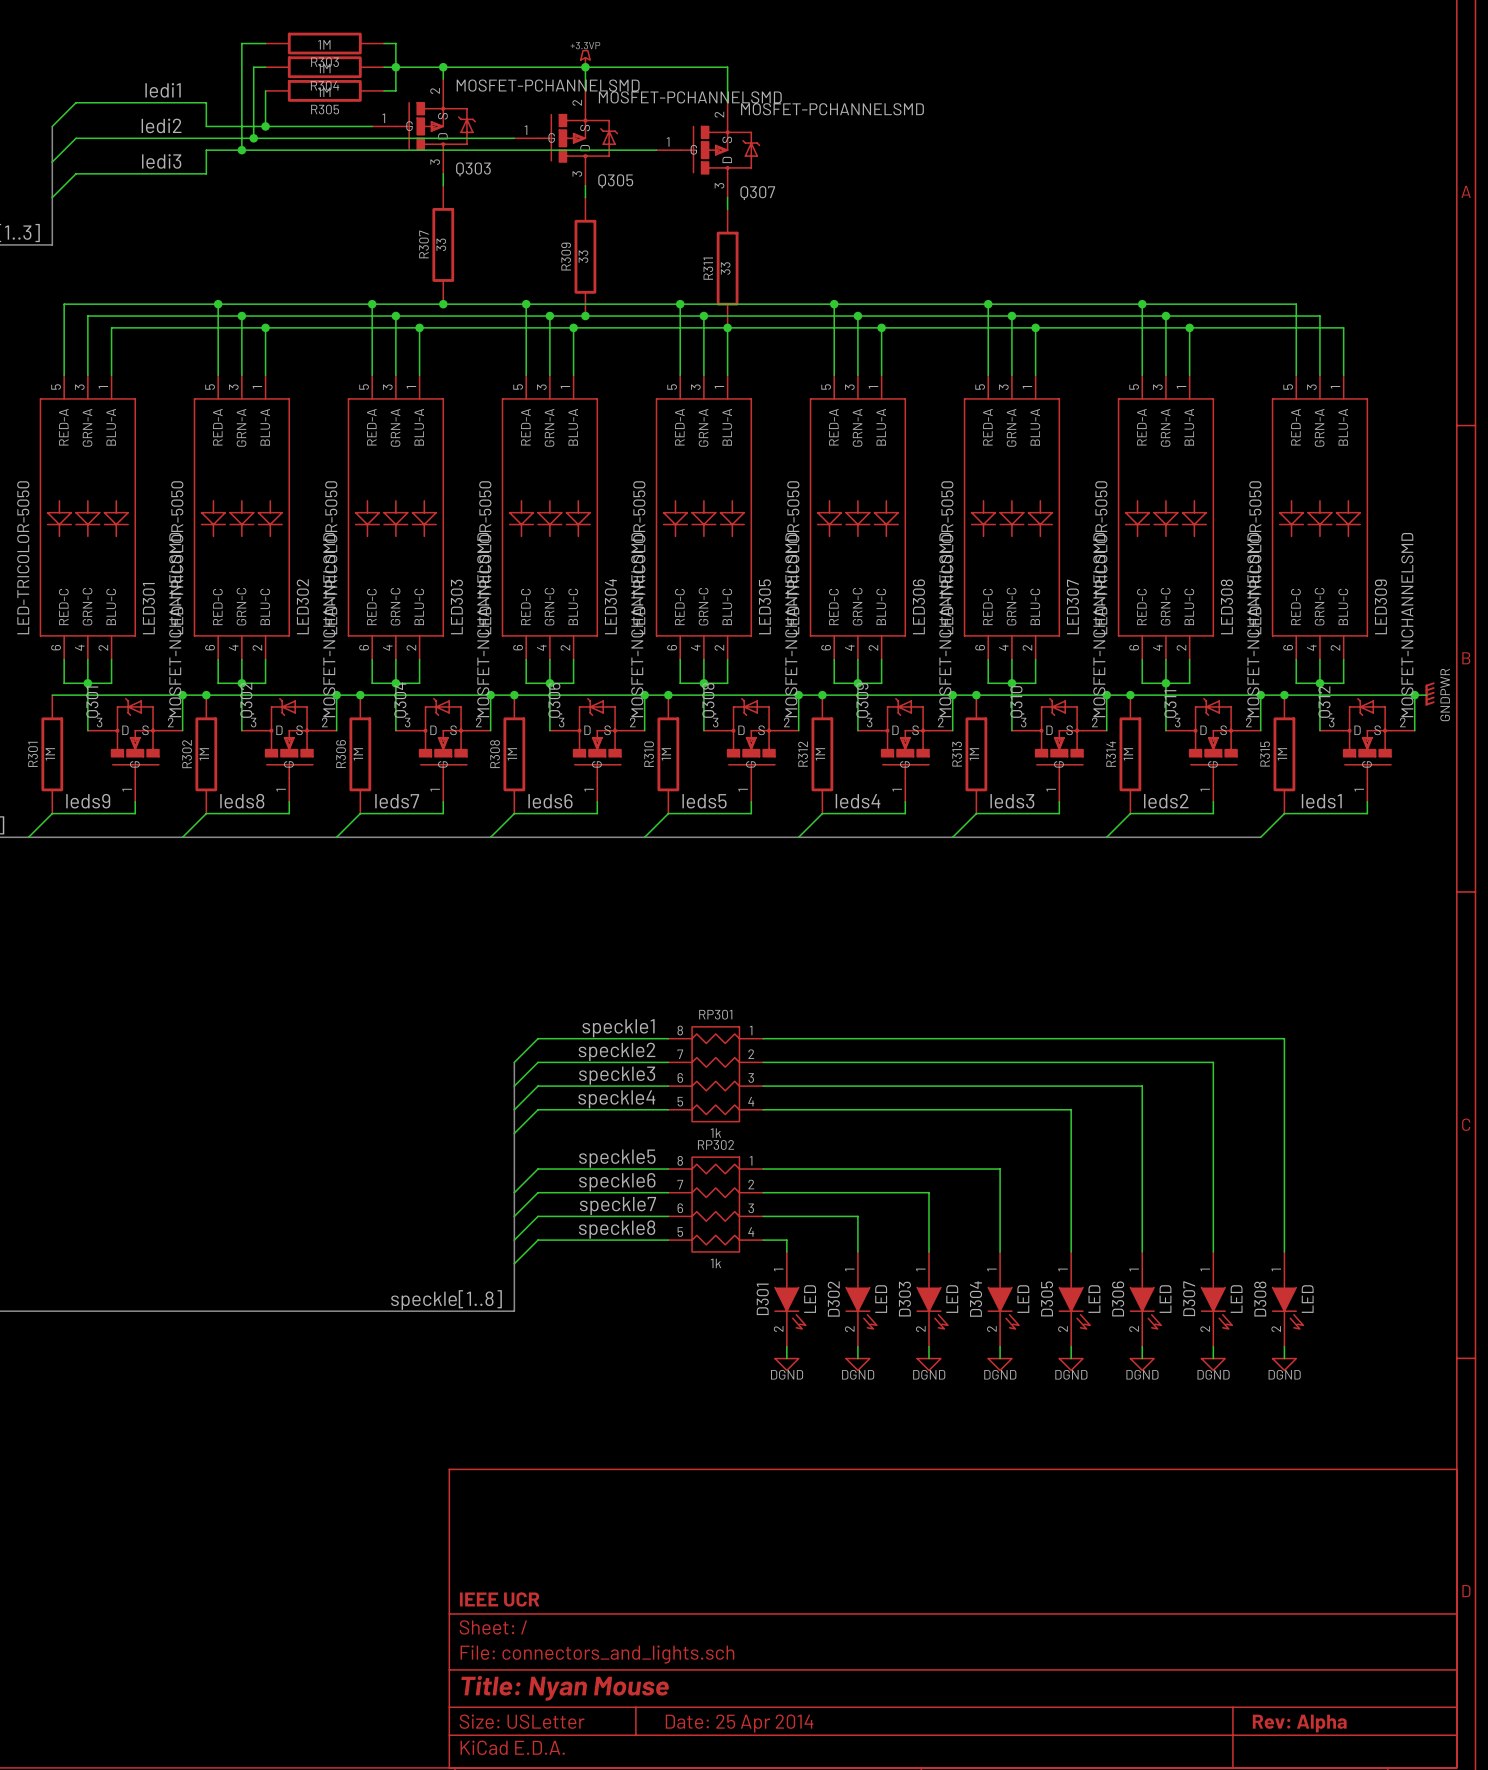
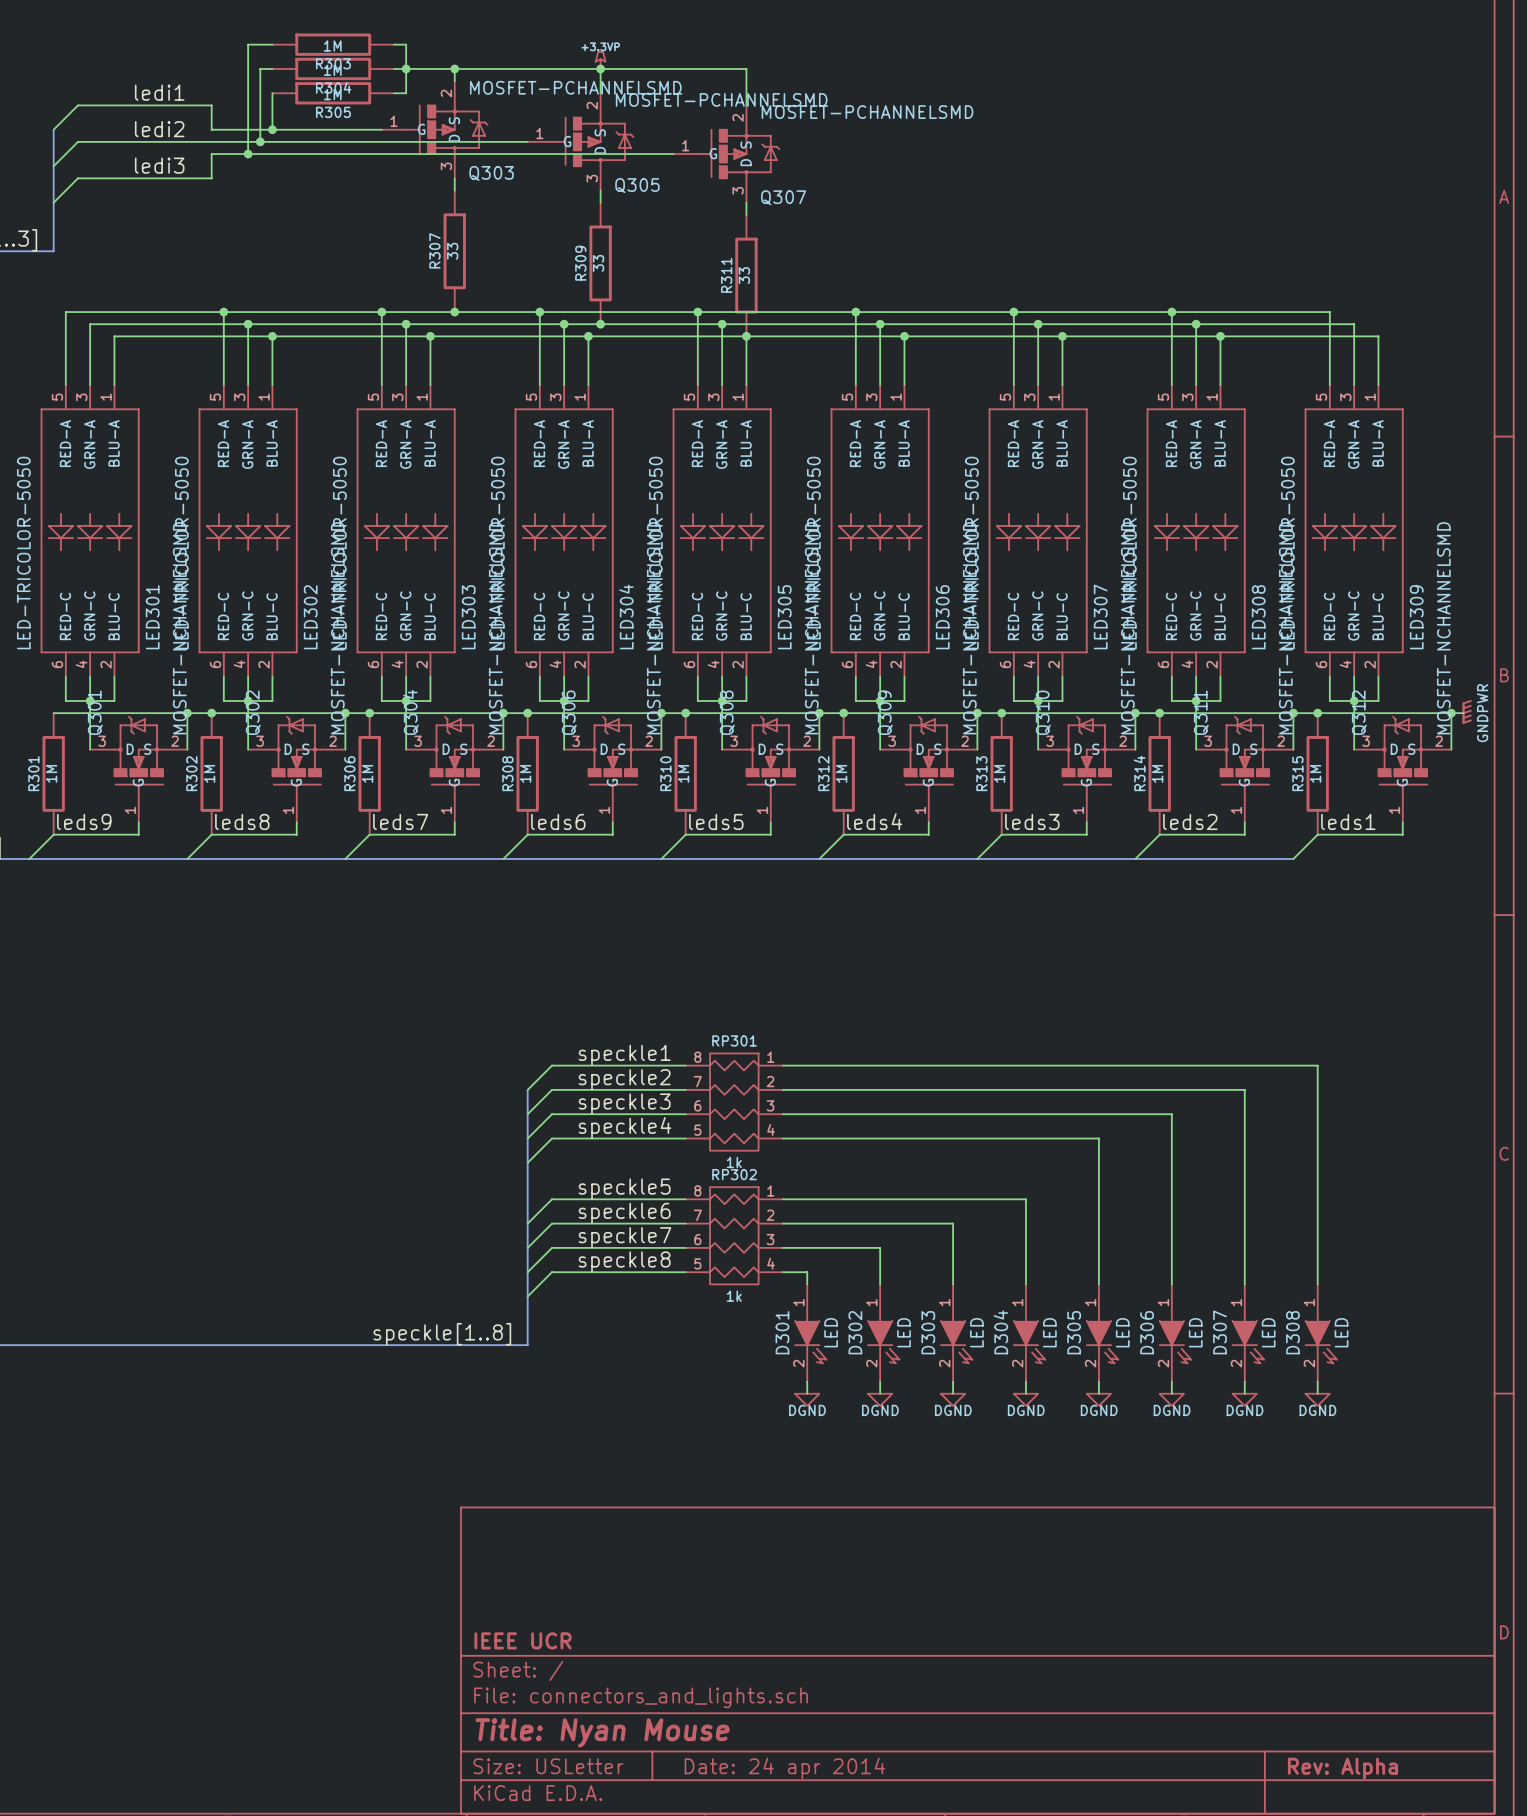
title block: Date: 25 Apr 2014 (739, 1723) -> Date: 24 apr 2014 (784, 1768)

